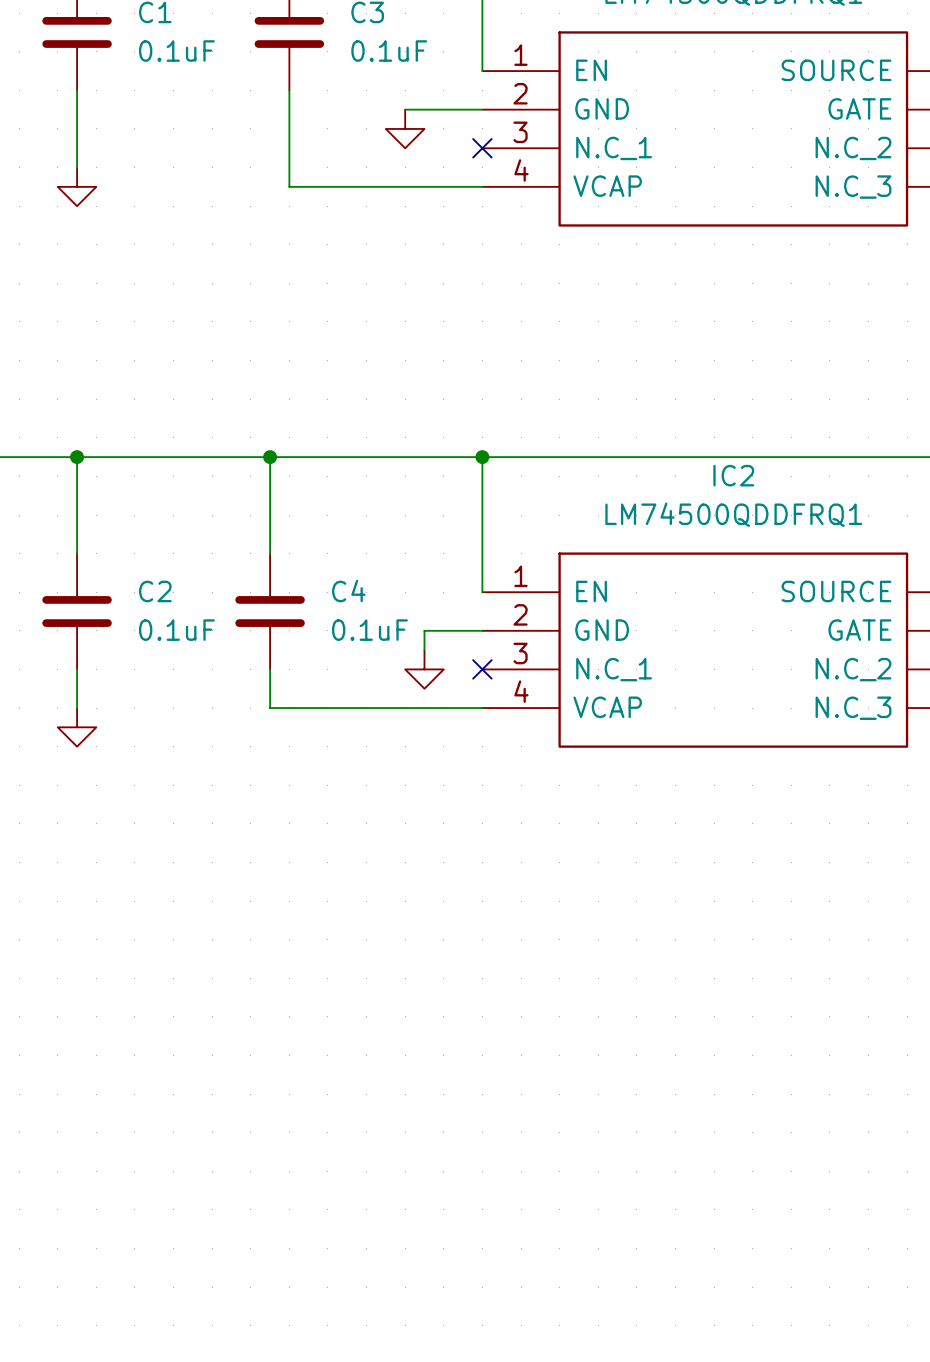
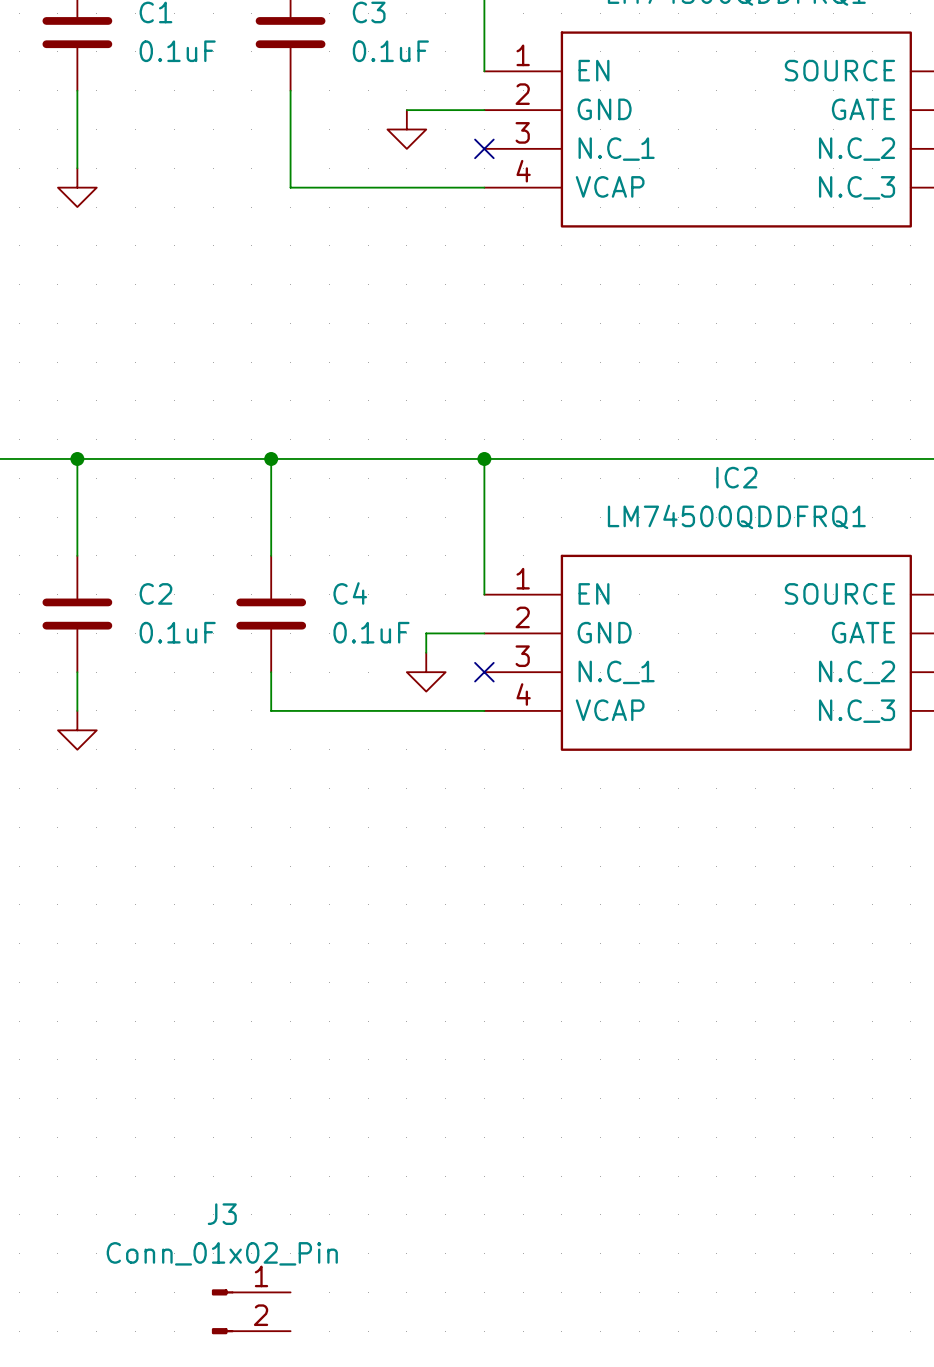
J3: none -> Conn_01x02_Pin (251, 1311)

